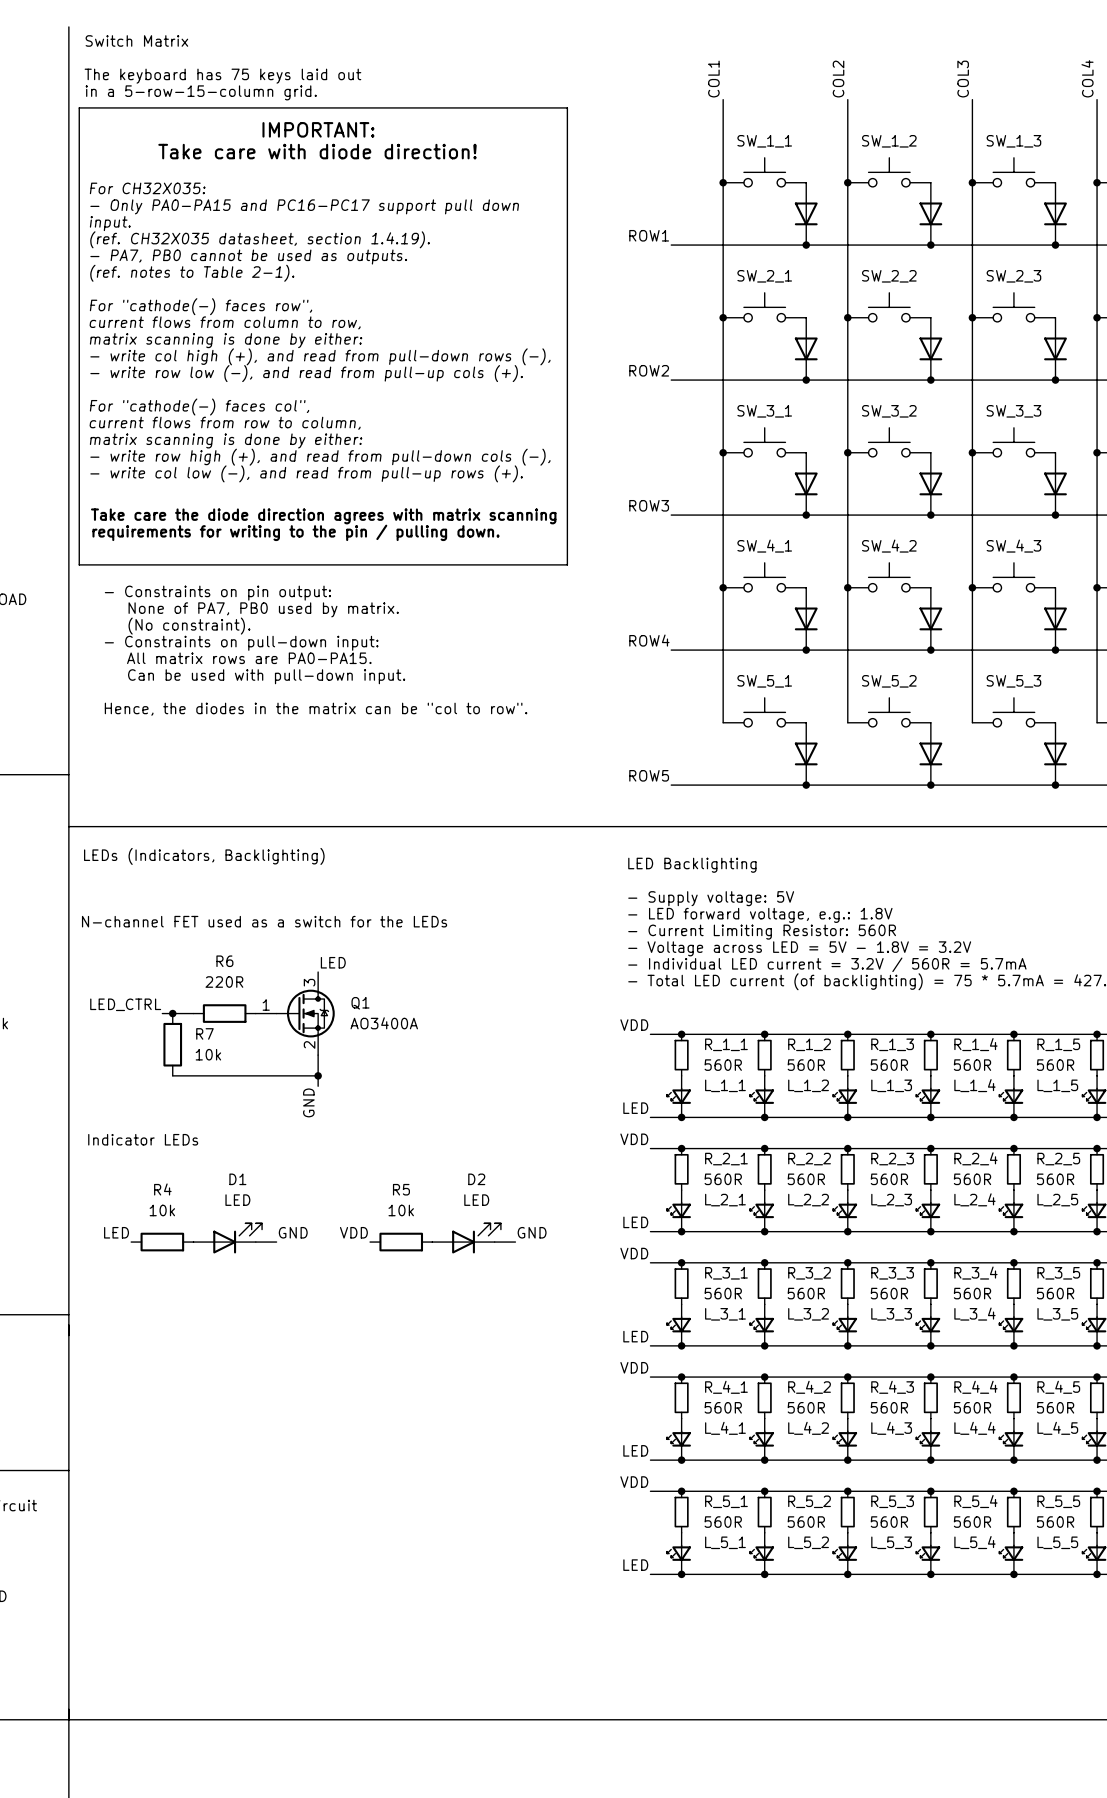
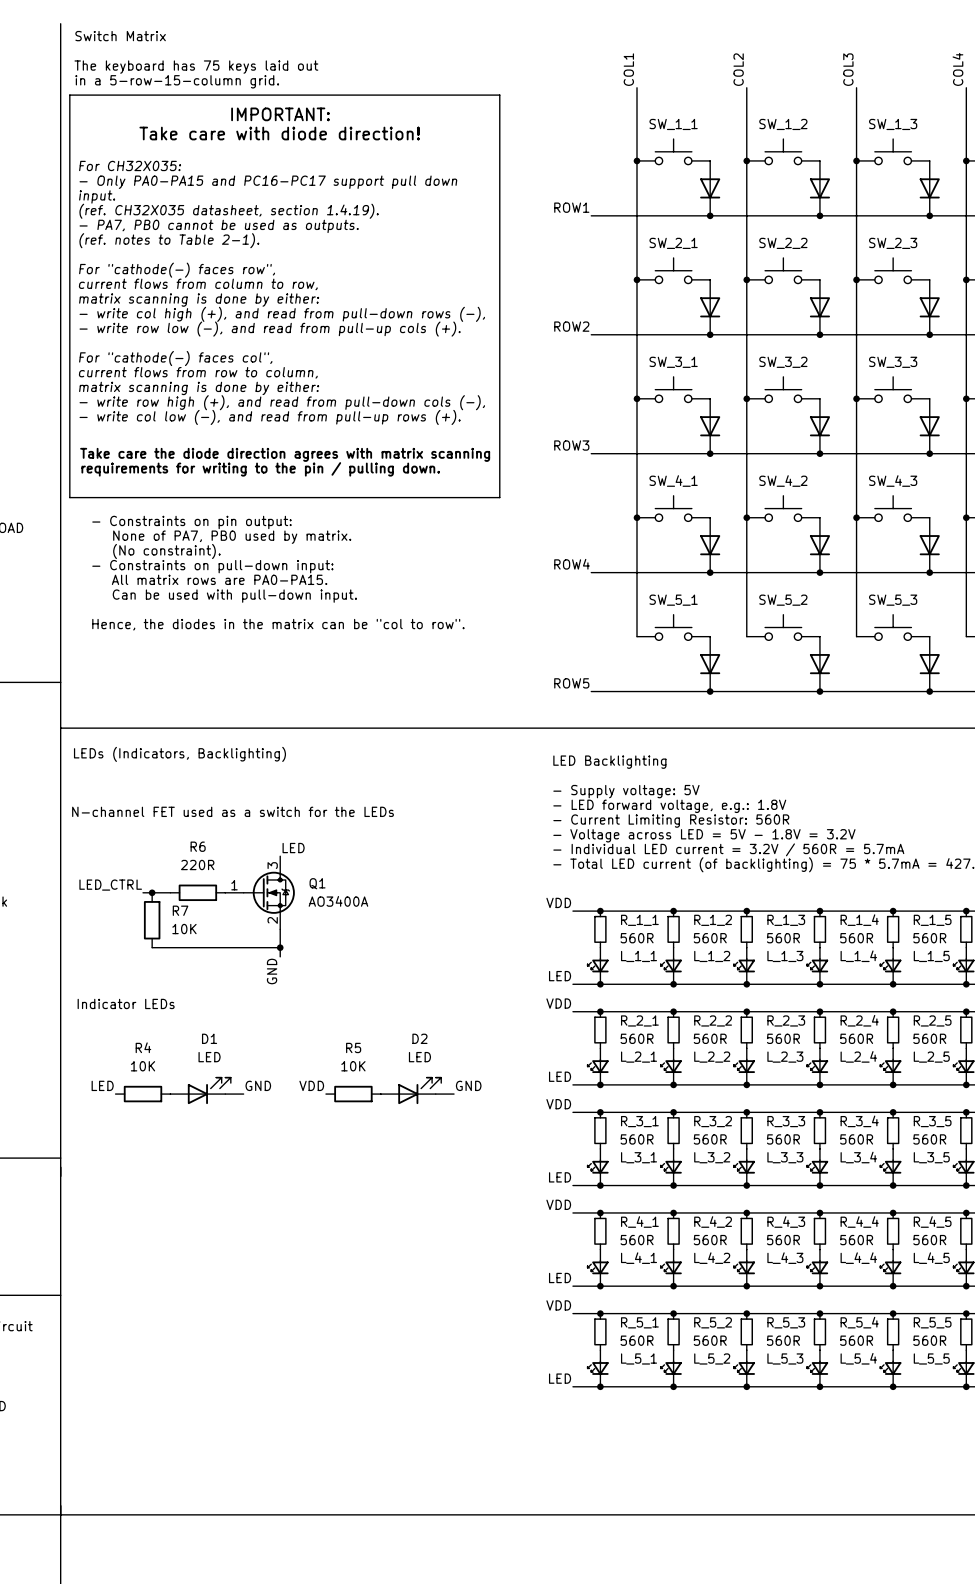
R7 value: 10k (208, 1054) -> 10K (184, 929)
R4 value: 10k (162, 1210) -> 10K (143, 1066)
R5 value: 10k (401, 1210) -> 10K (353, 1066)

